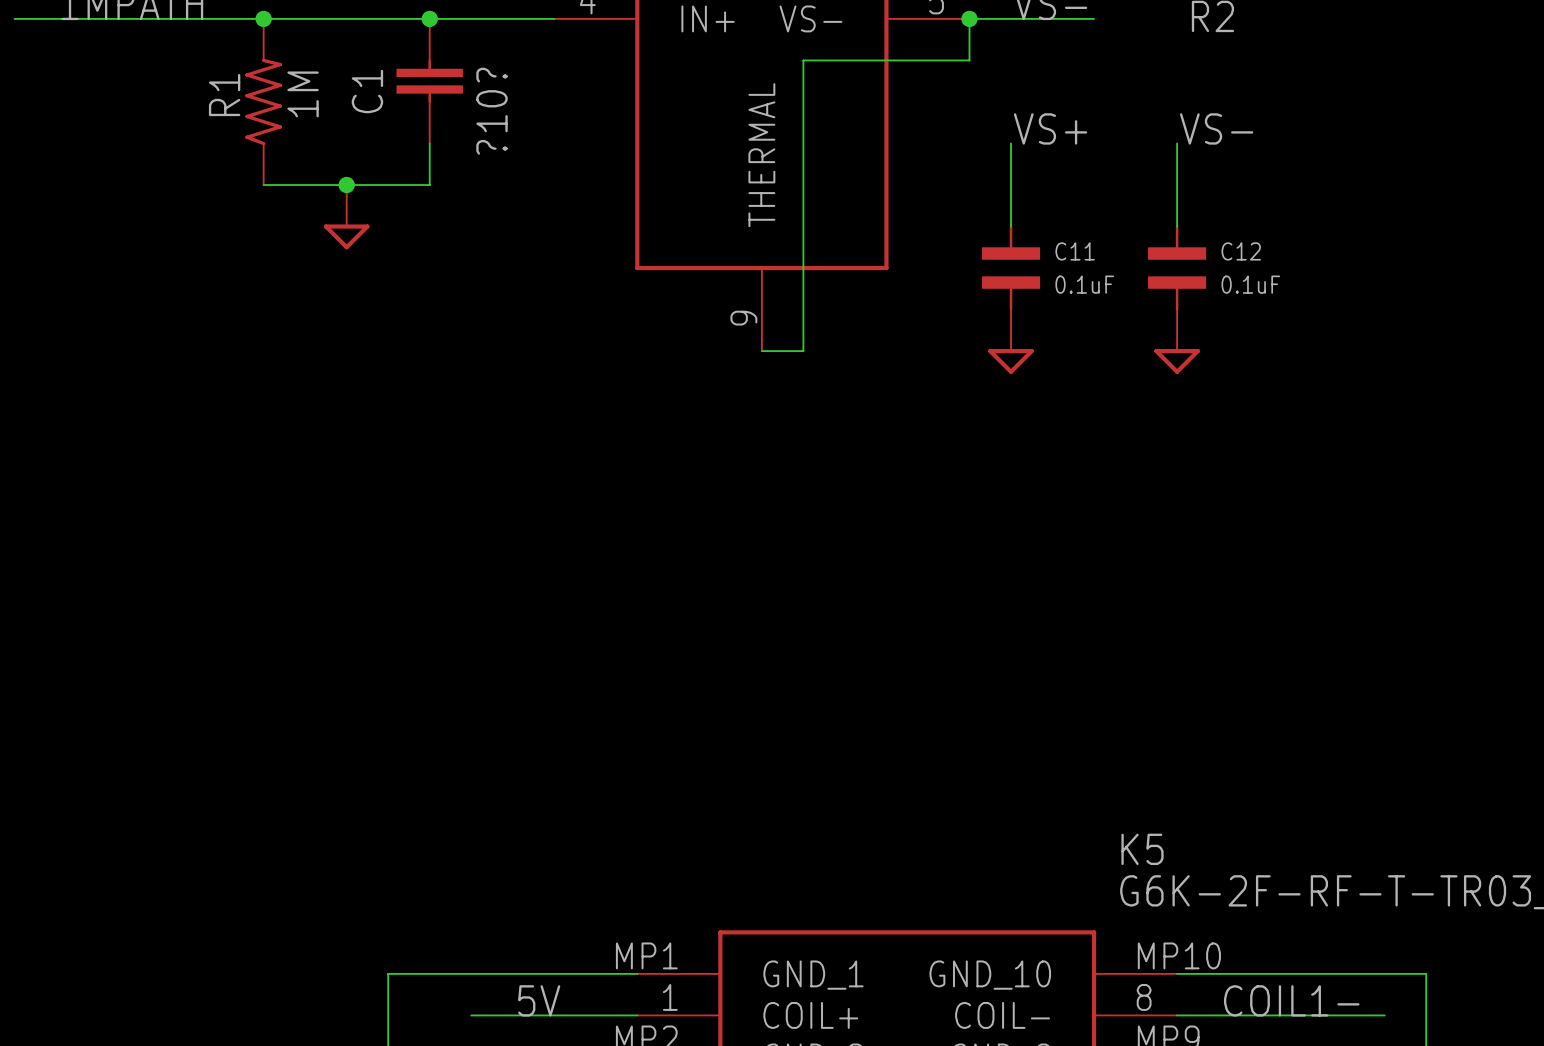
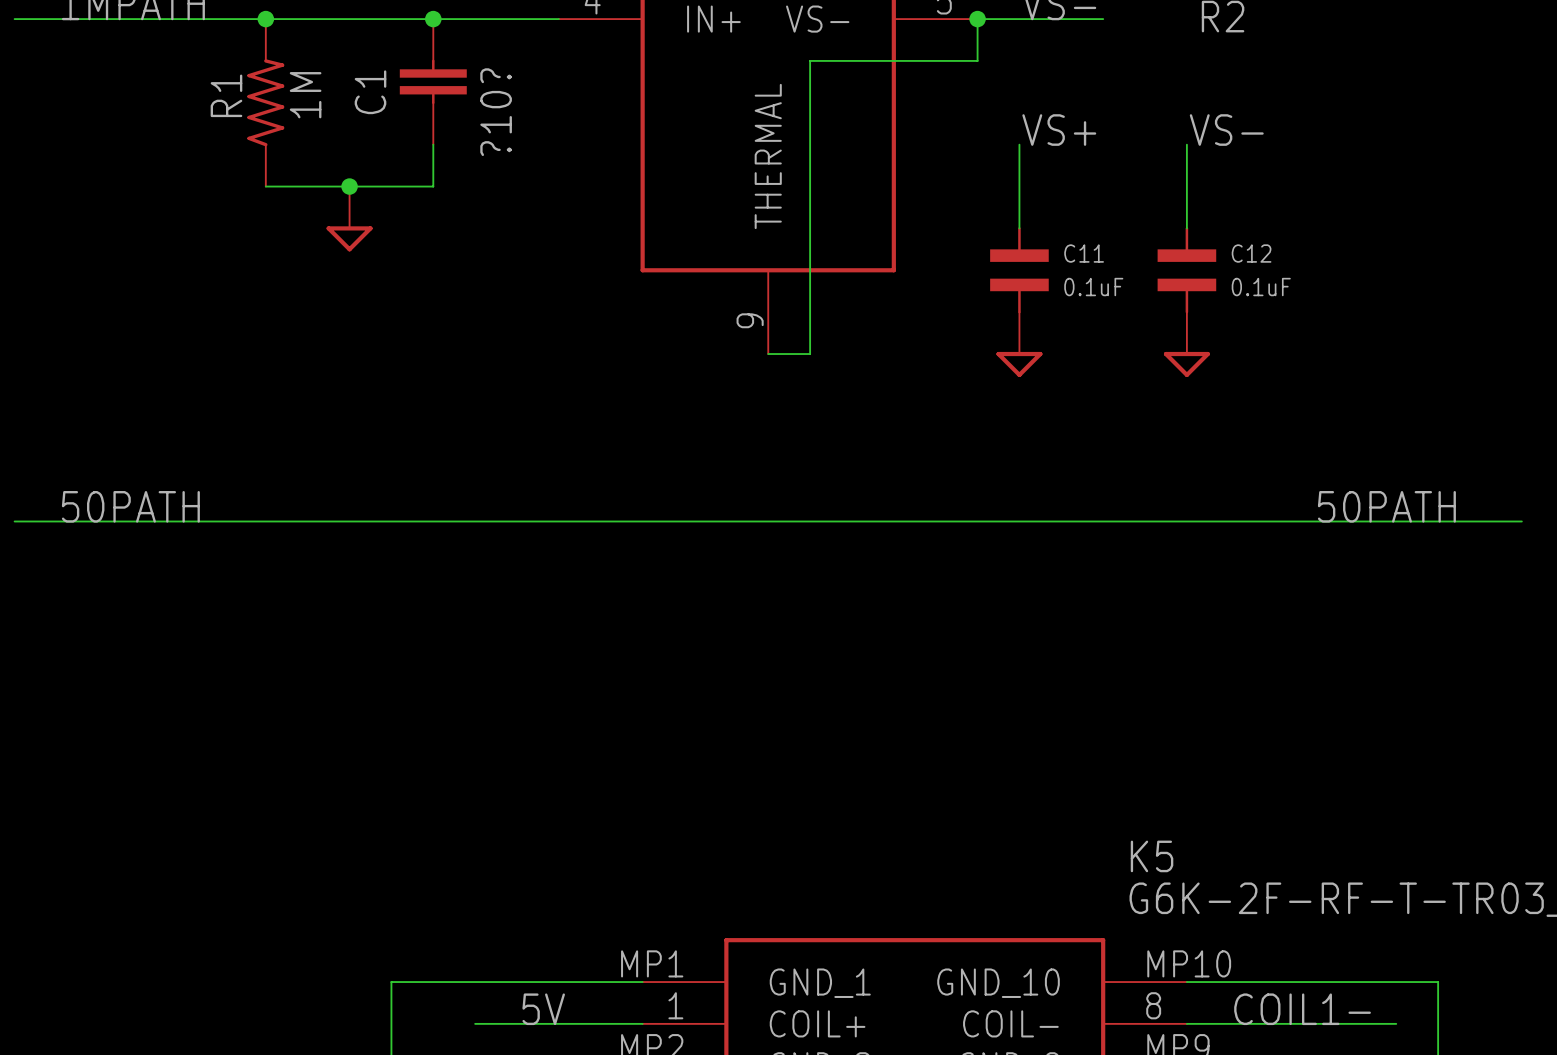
label: none -> 50PATH (130, 506)
label: none -> 50PATH (1386, 506)
wire: none -> (14, 521) (1521, 521)

